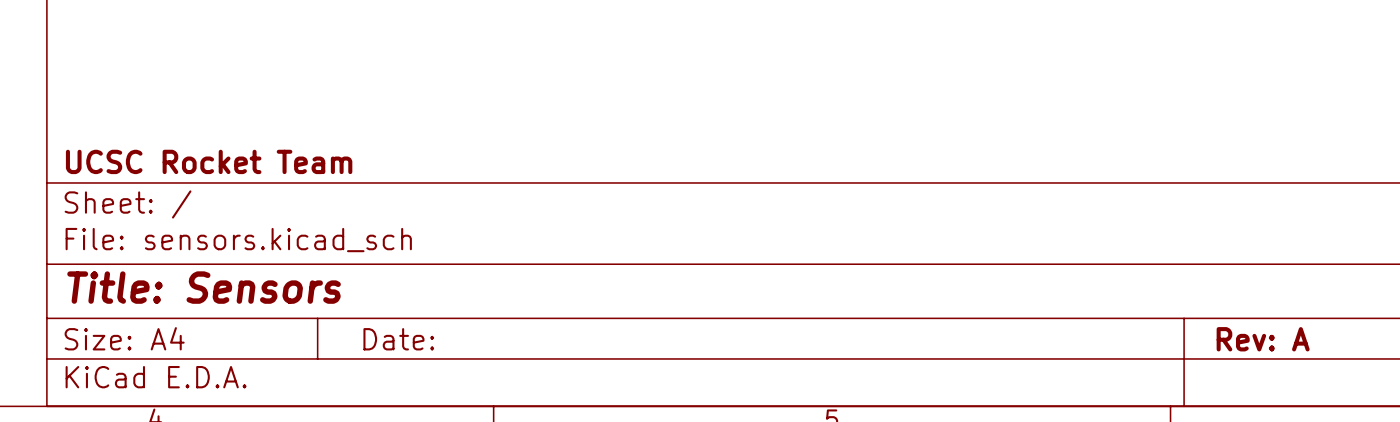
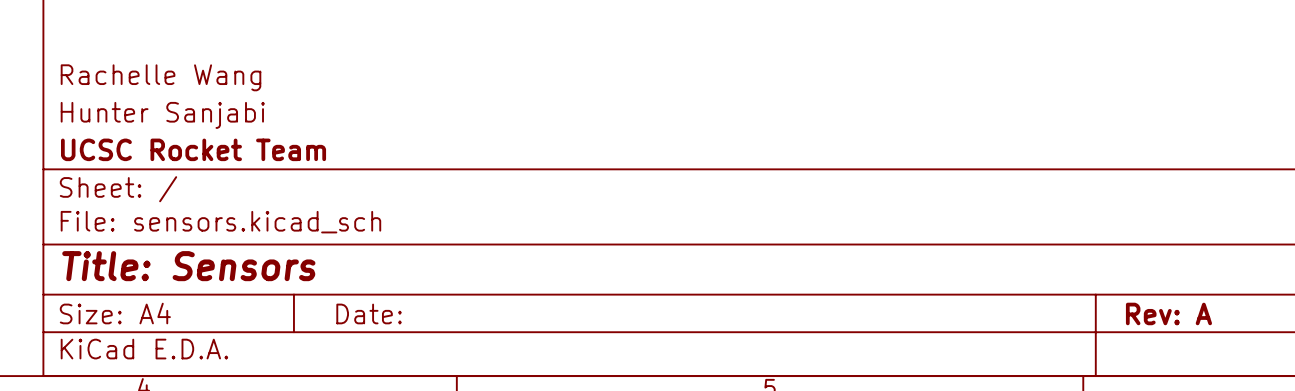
title block: none -> Rachelle Wang (160, 77)
title block: none -> Hunter Sanjabi (162, 115)

